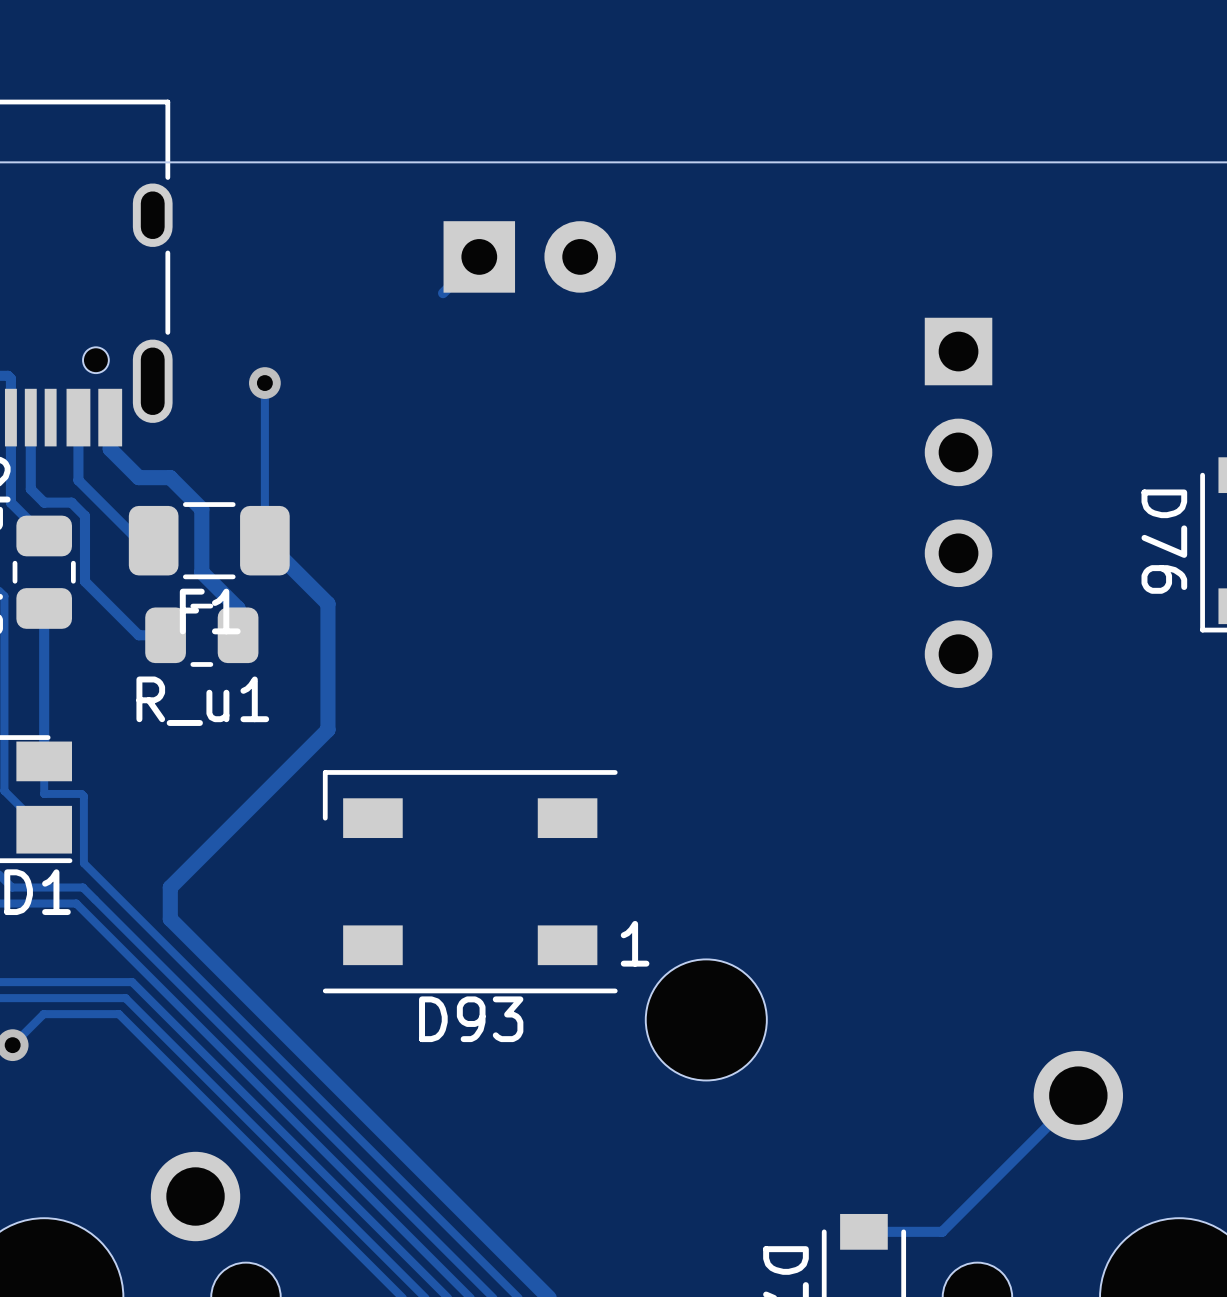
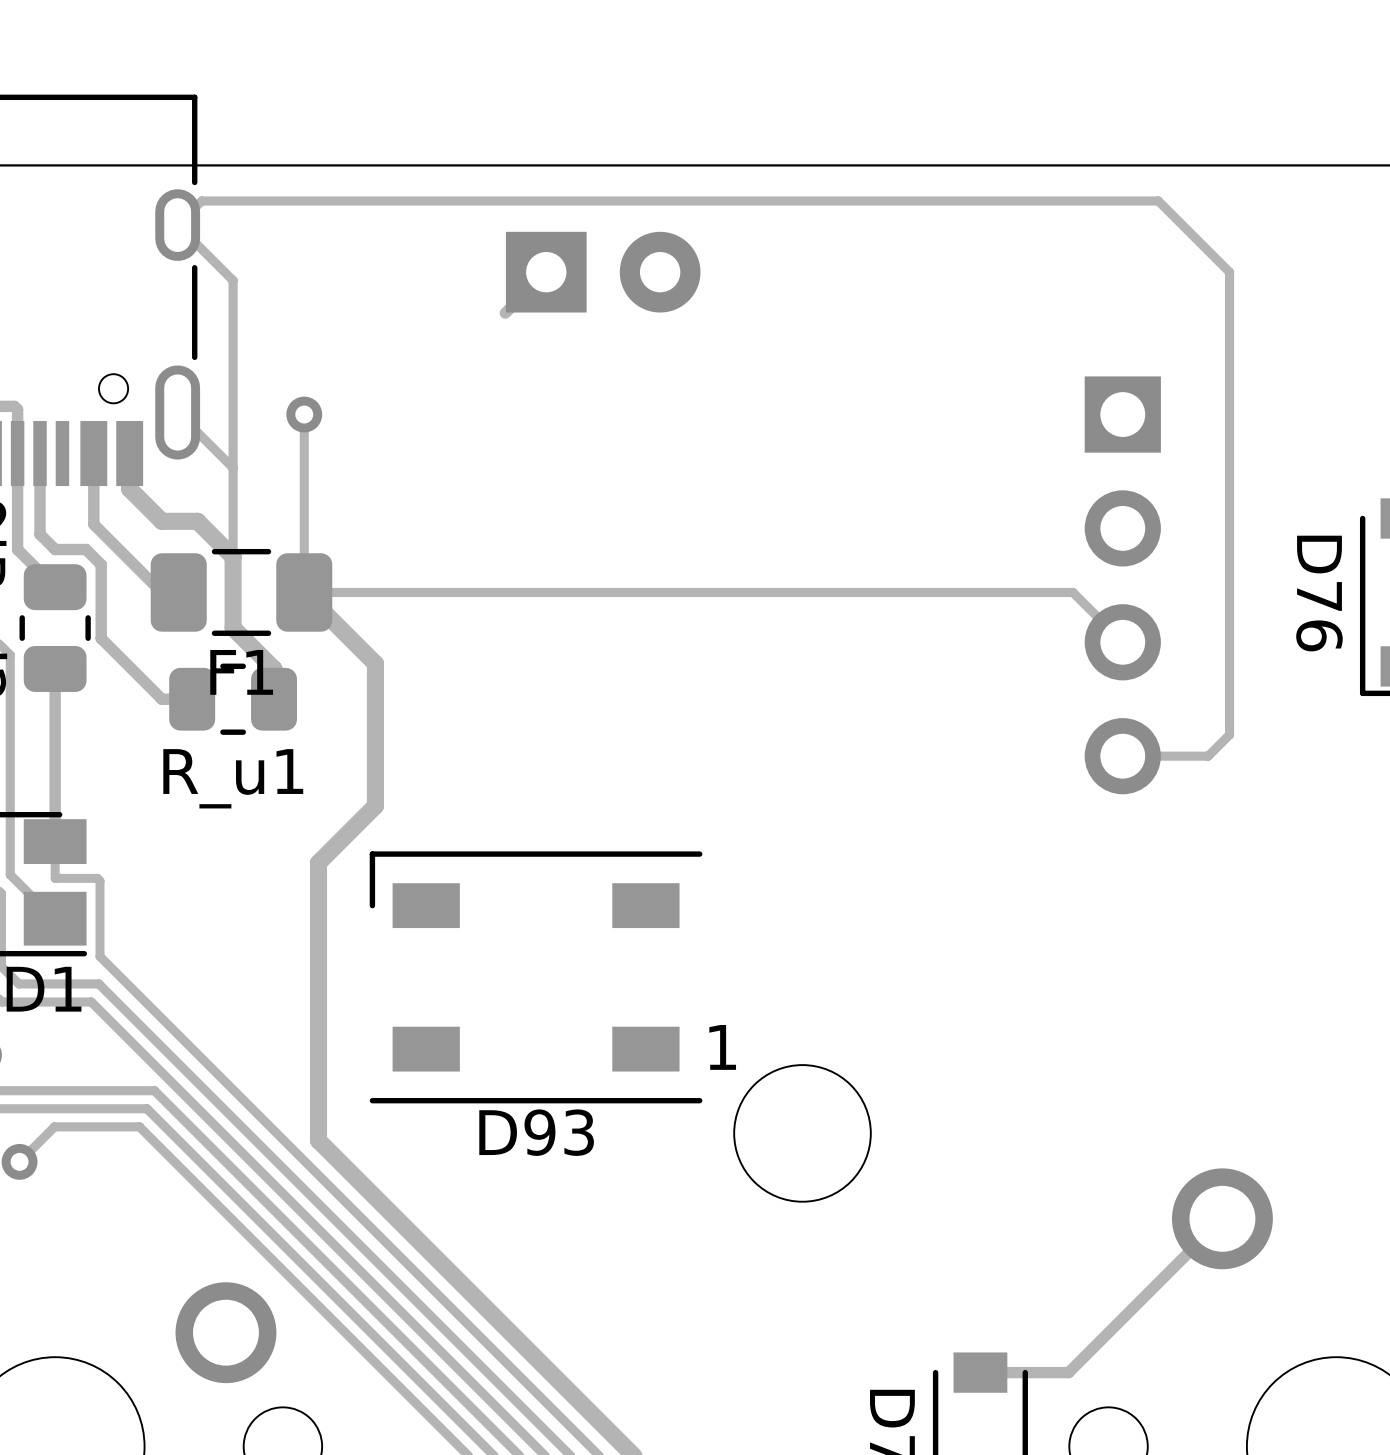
track: none -> (177, 412) (233, 467)
part position: (958, 502) -> (1122, 585)
track: none -> (233, 556) (233, 280) (177, 225) (201, 201) (1158, 201) (1229, 272) (1229, 734) (1208, 756) (1122, 756)
track: none -> (304, 592) (1072, 592) (1122, 642)
track: (277, 780) (170, 887) (170, 919) (277, 1026) -> (318, 862) (318, 1140)

